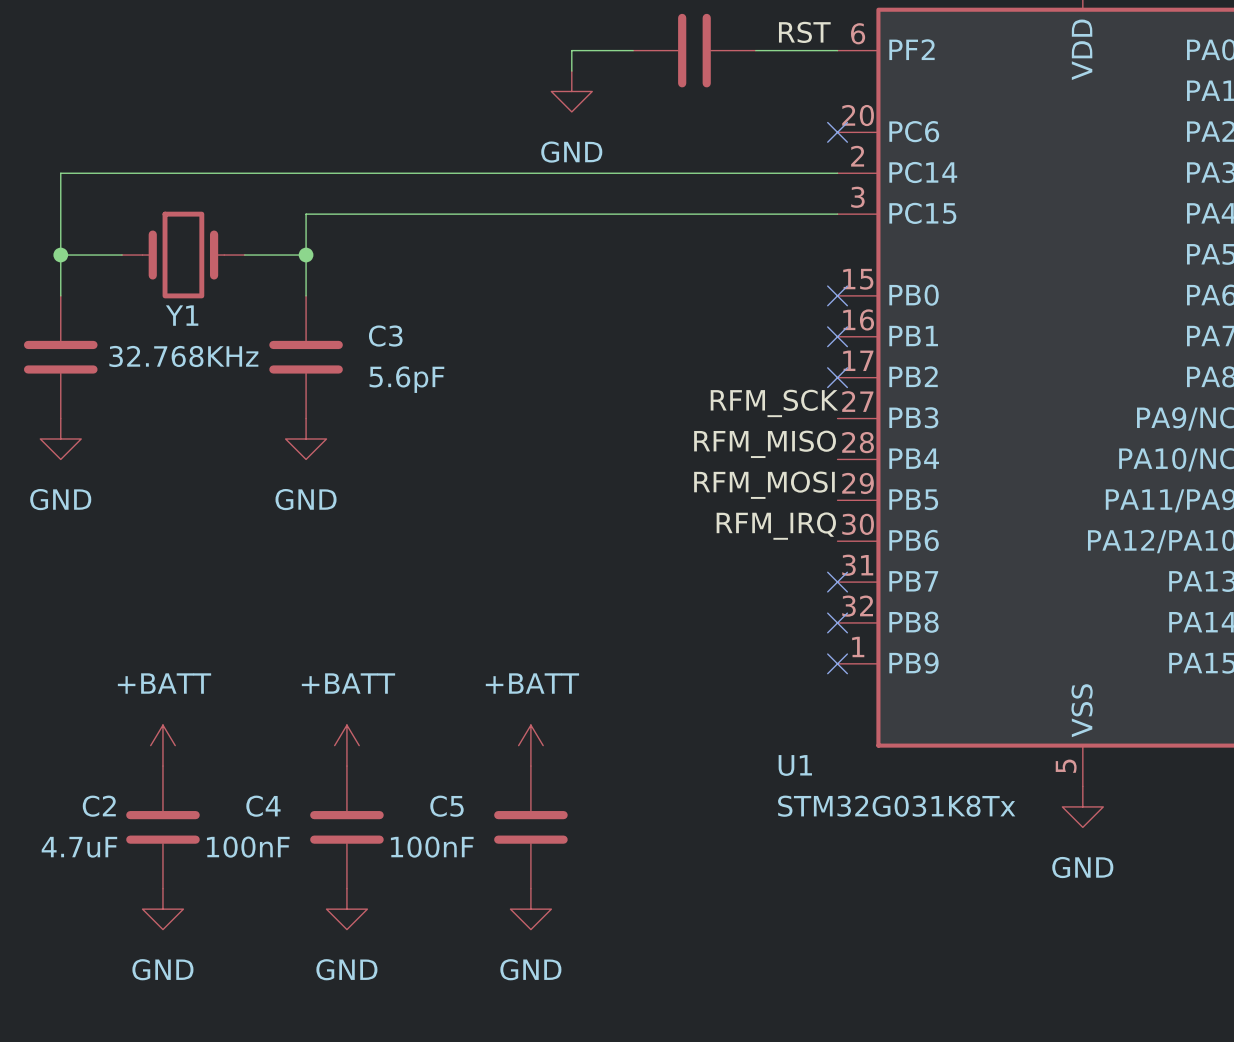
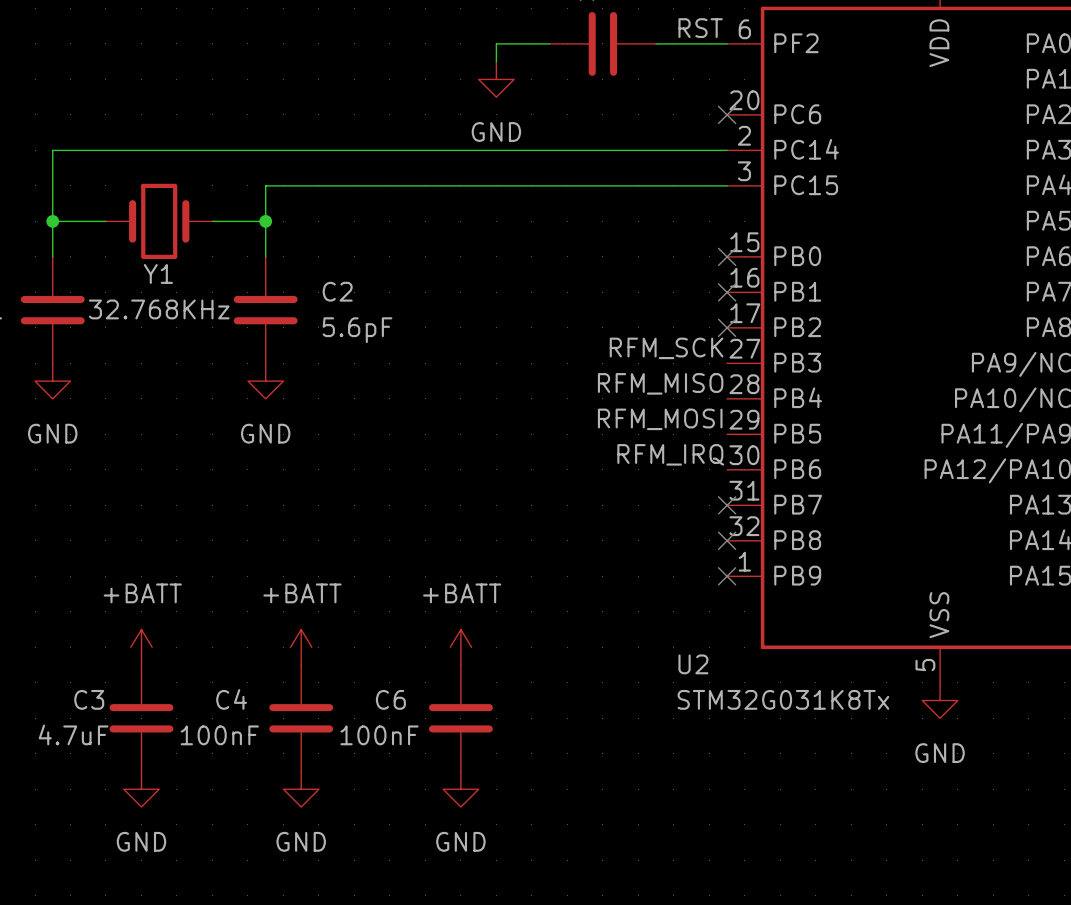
C3 name: C3 (385, 336) -> C2 (337, 291)
U1 name: U1 (795, 765) -> U2 (693, 664)
C2 name: C2 (99, 806) -> C3 (89, 699)
C5 name: C5 (446, 806) -> C6 (390, 699)

